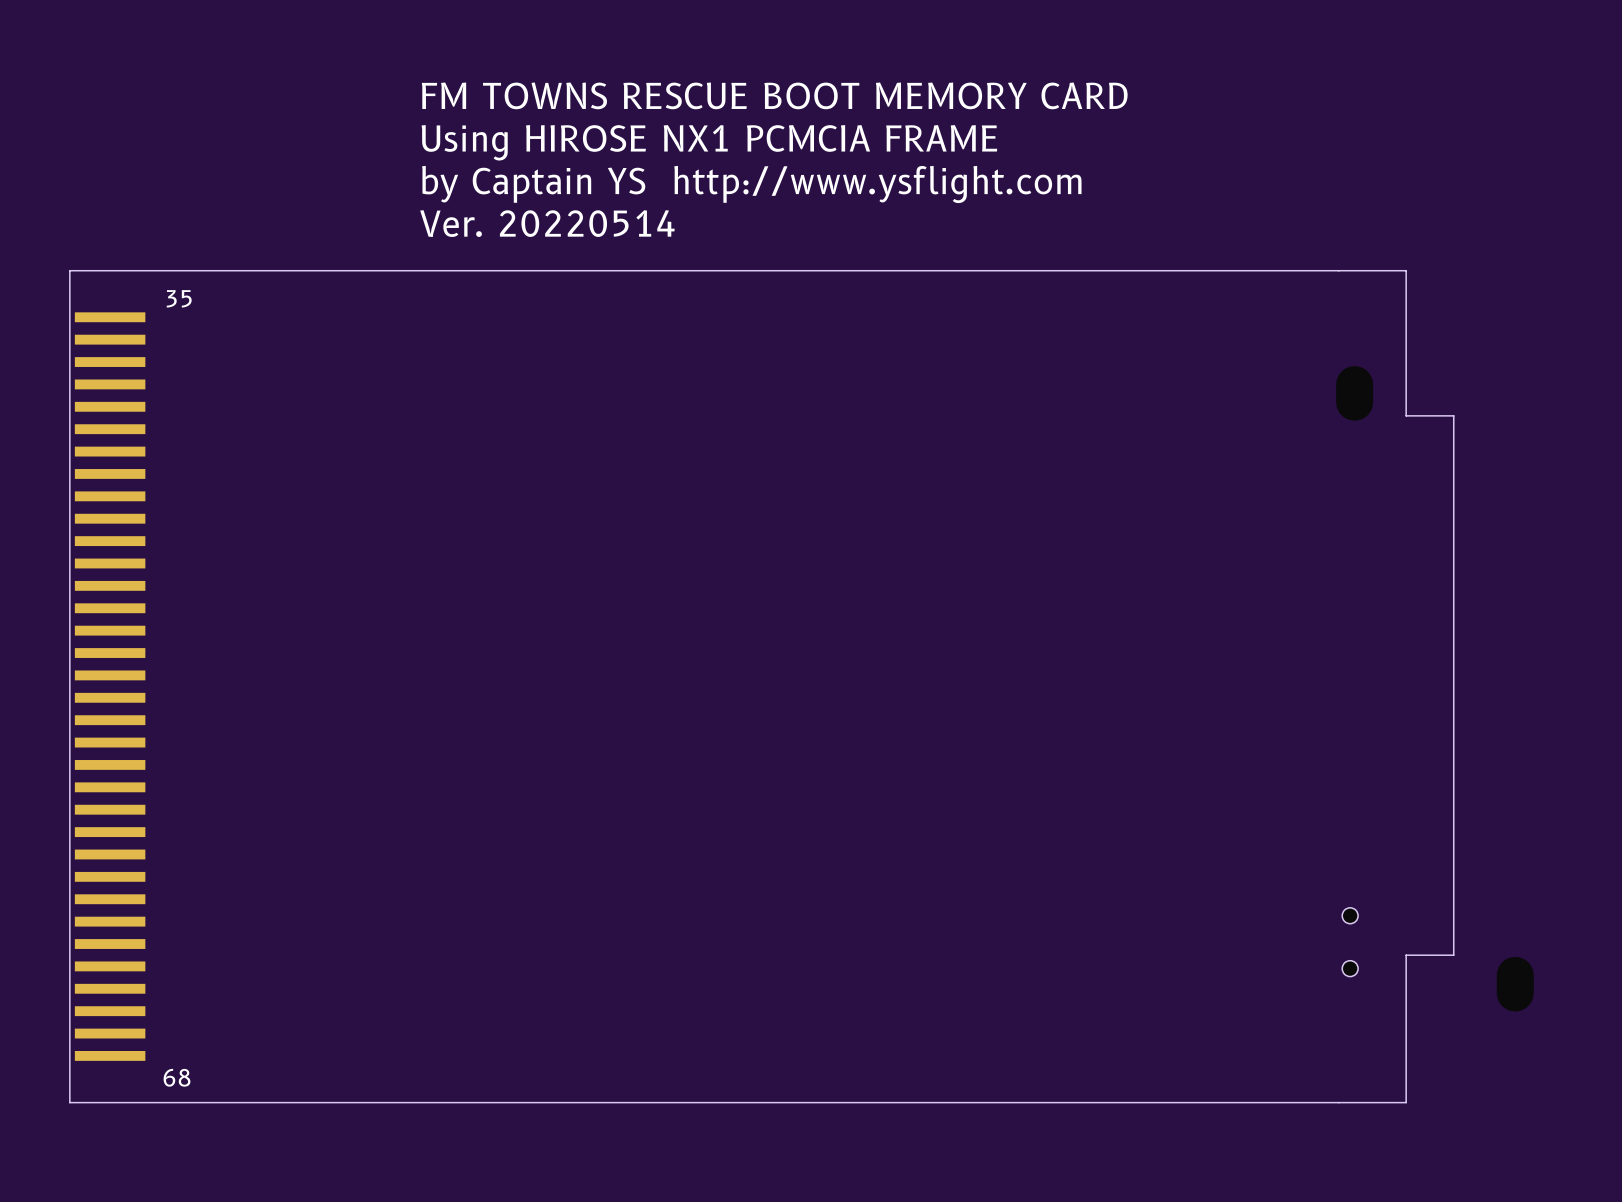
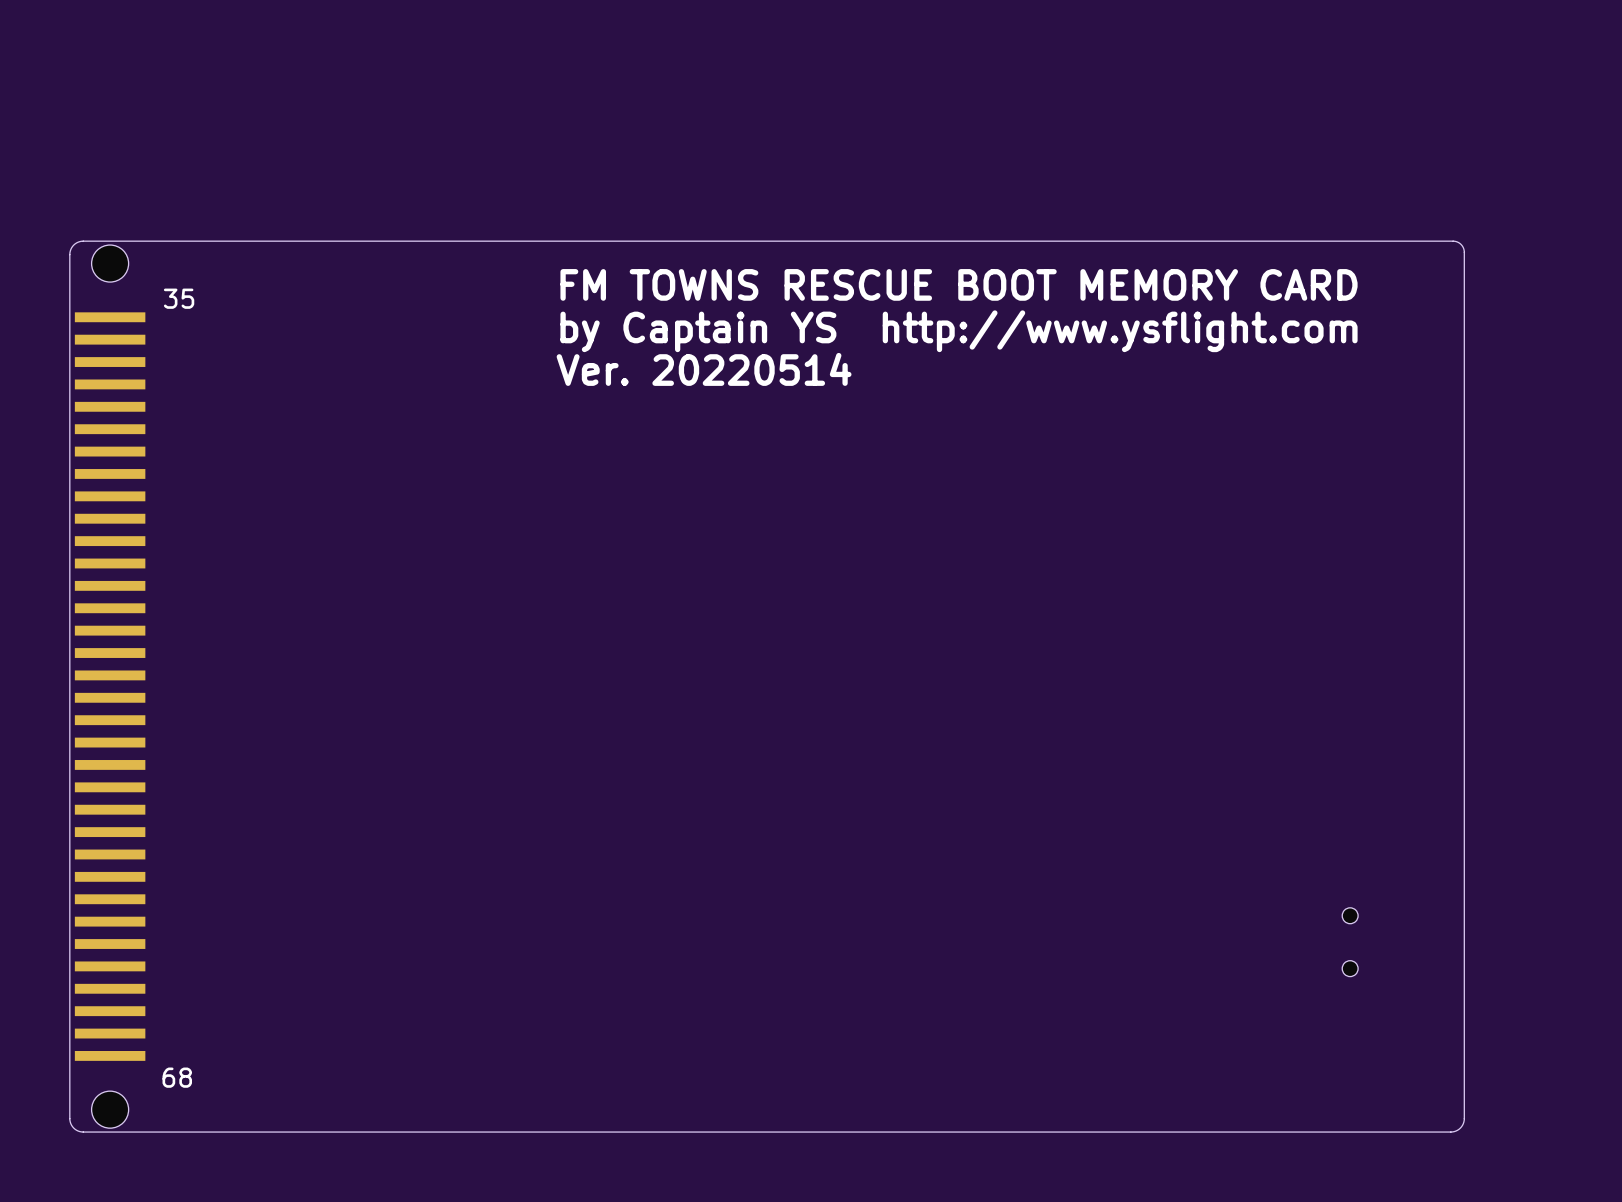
text position: FM TOWNS RESCUE BOOT MEMORY CARD (774, 95) -> FM TOWNS RESCUE BOOT MEMORY CARD (959, 284)
text: Using HIROSE NX1 PCMCIA FRAME (709, 142) -> none
text position: by Captain YS http://www.ysflight.com (751, 184) -> by Captain YS http://www.ysflight.com (959, 331)
text position: Ver. 20220514 (547, 223) -> Ver. 20220514 (704, 369)
part: none -> (110, 263)
board edge: (69, 270) (1406, 270) (1406, 415) (1453, 415) (1453, 955) (1406, 955) (1406, 1102) (69, 1102) -> (69, 270) (70, 249) (75, 243) (83, 241) (1453, 241) (1461, 244) (1464, 252) (1464, 1118) (1462, 1125) (1457, 1130) (1450, 1132) (83, 1132) (75, 1129) (70, 1123) (69, 1102)
part: (1354, 393) -> none
part: (1515, 984) -> none
part: none -> (110, 1109)

